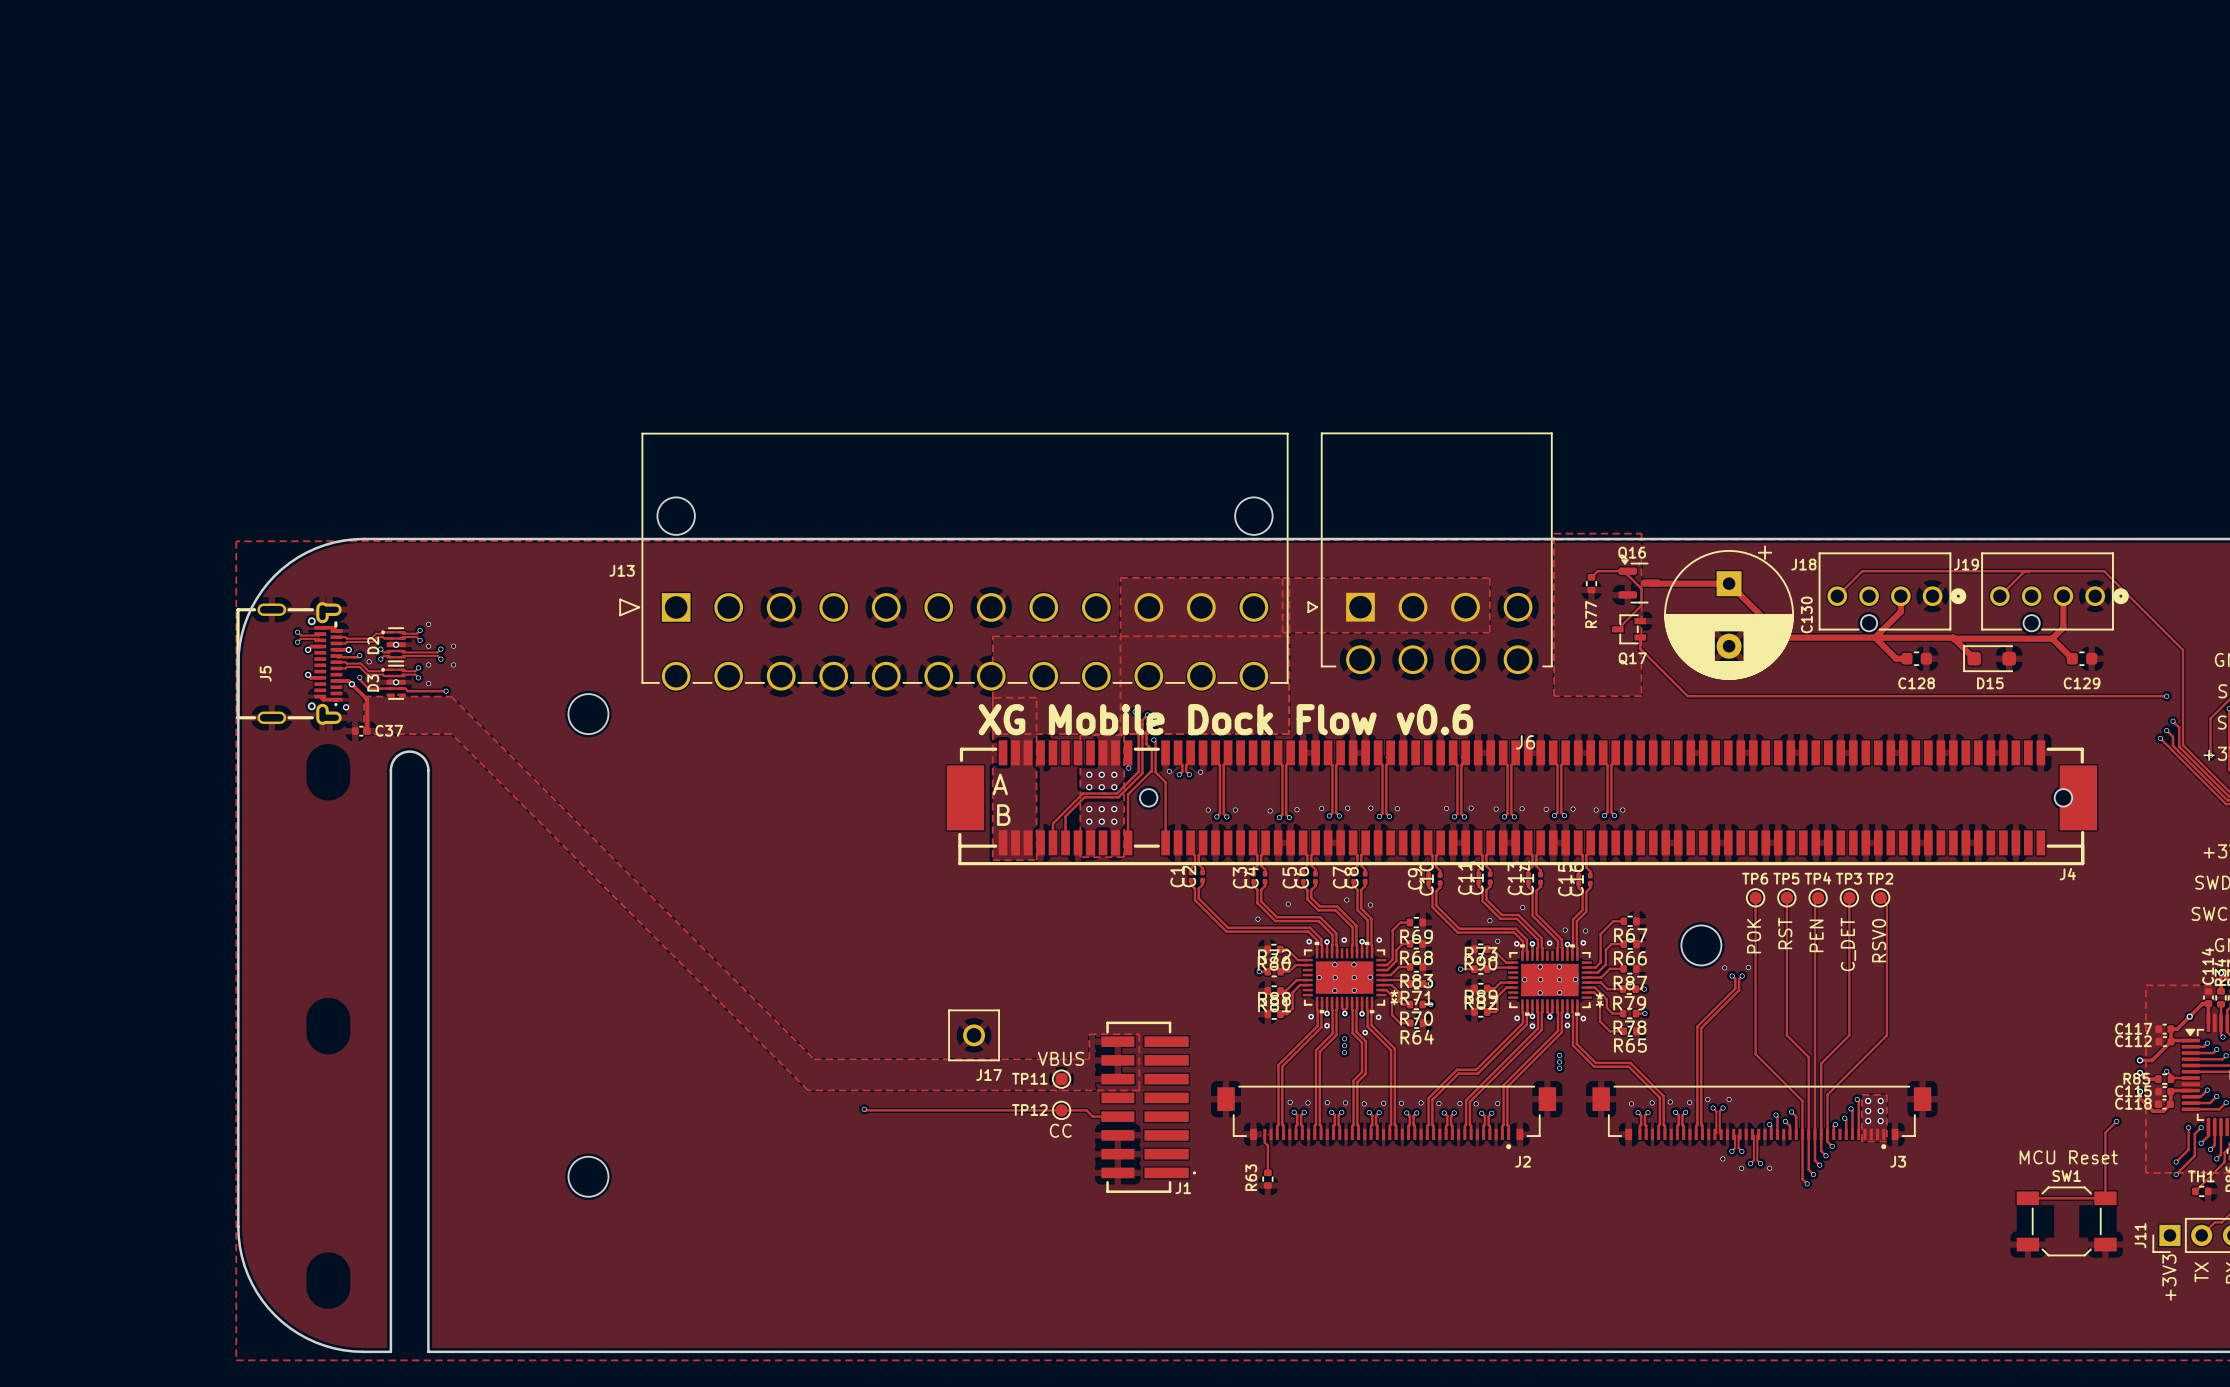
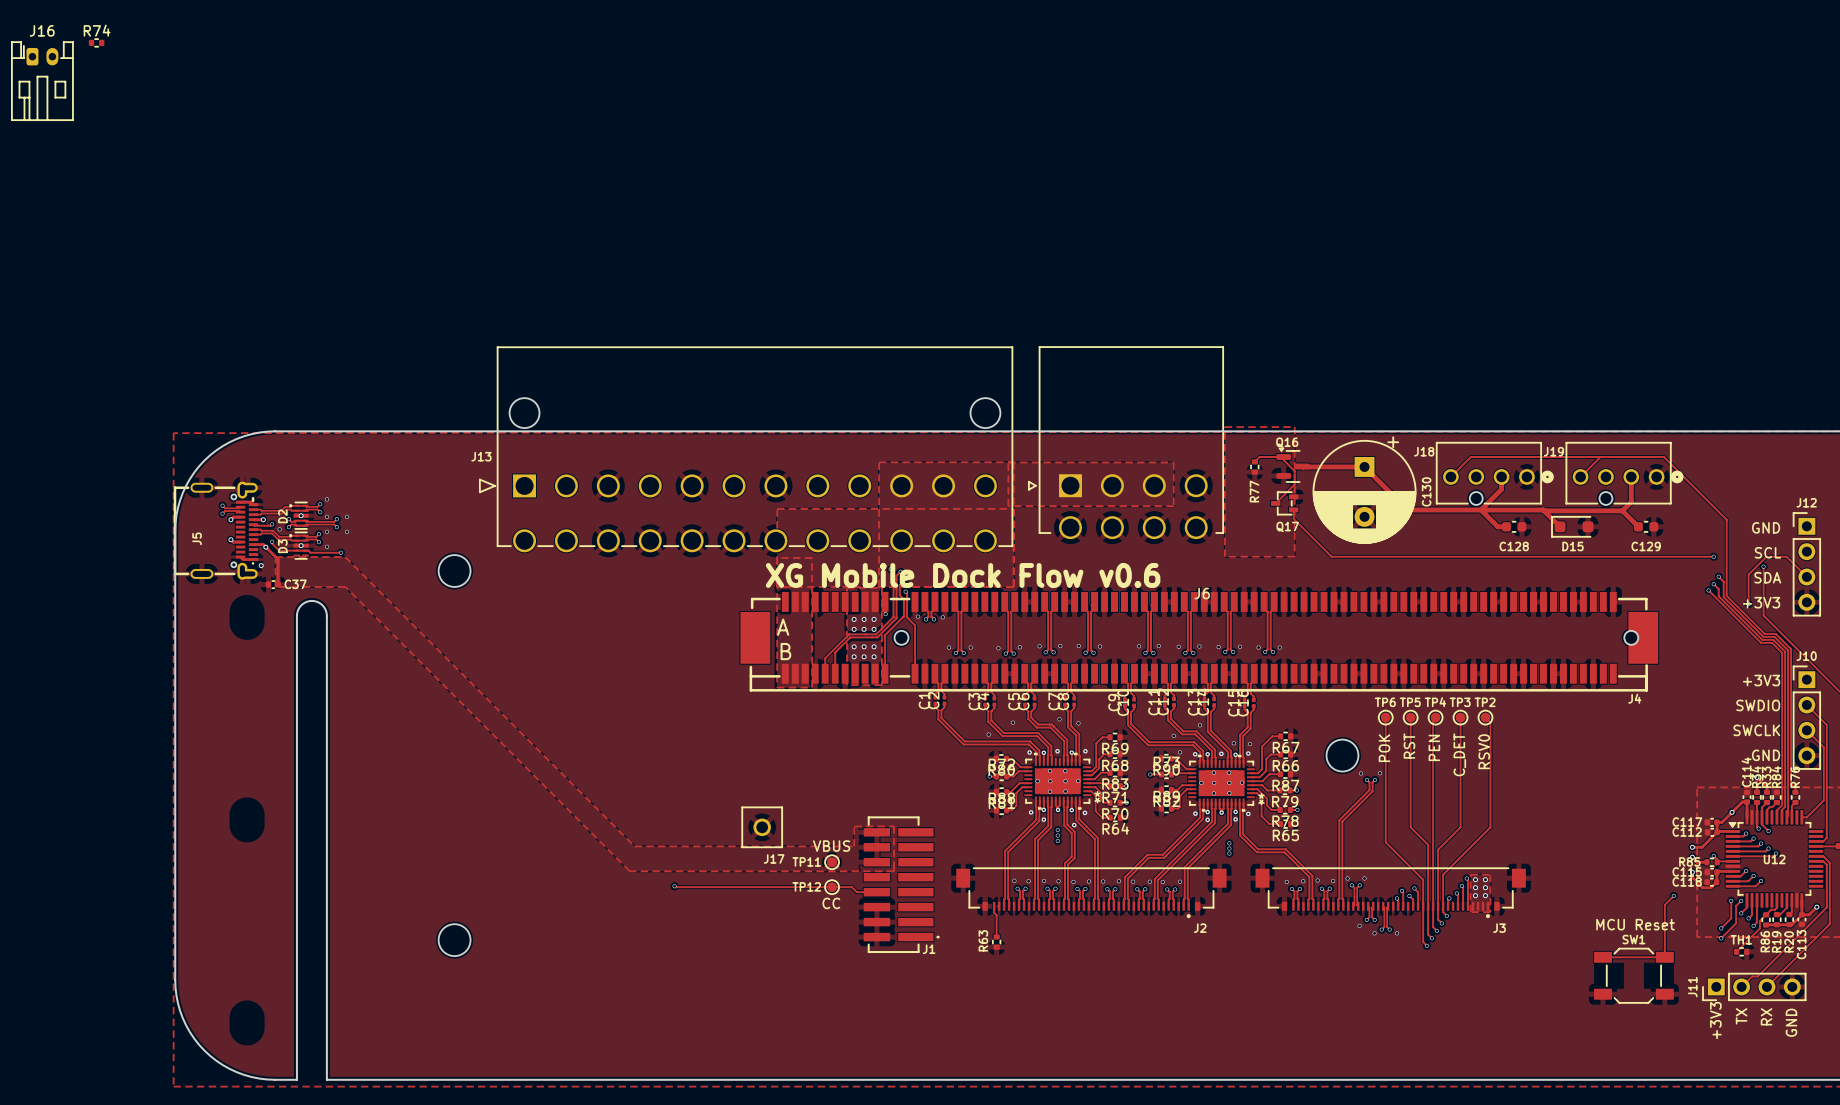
R74: none -> (96, 42)
J16: none -> (42, 81)

